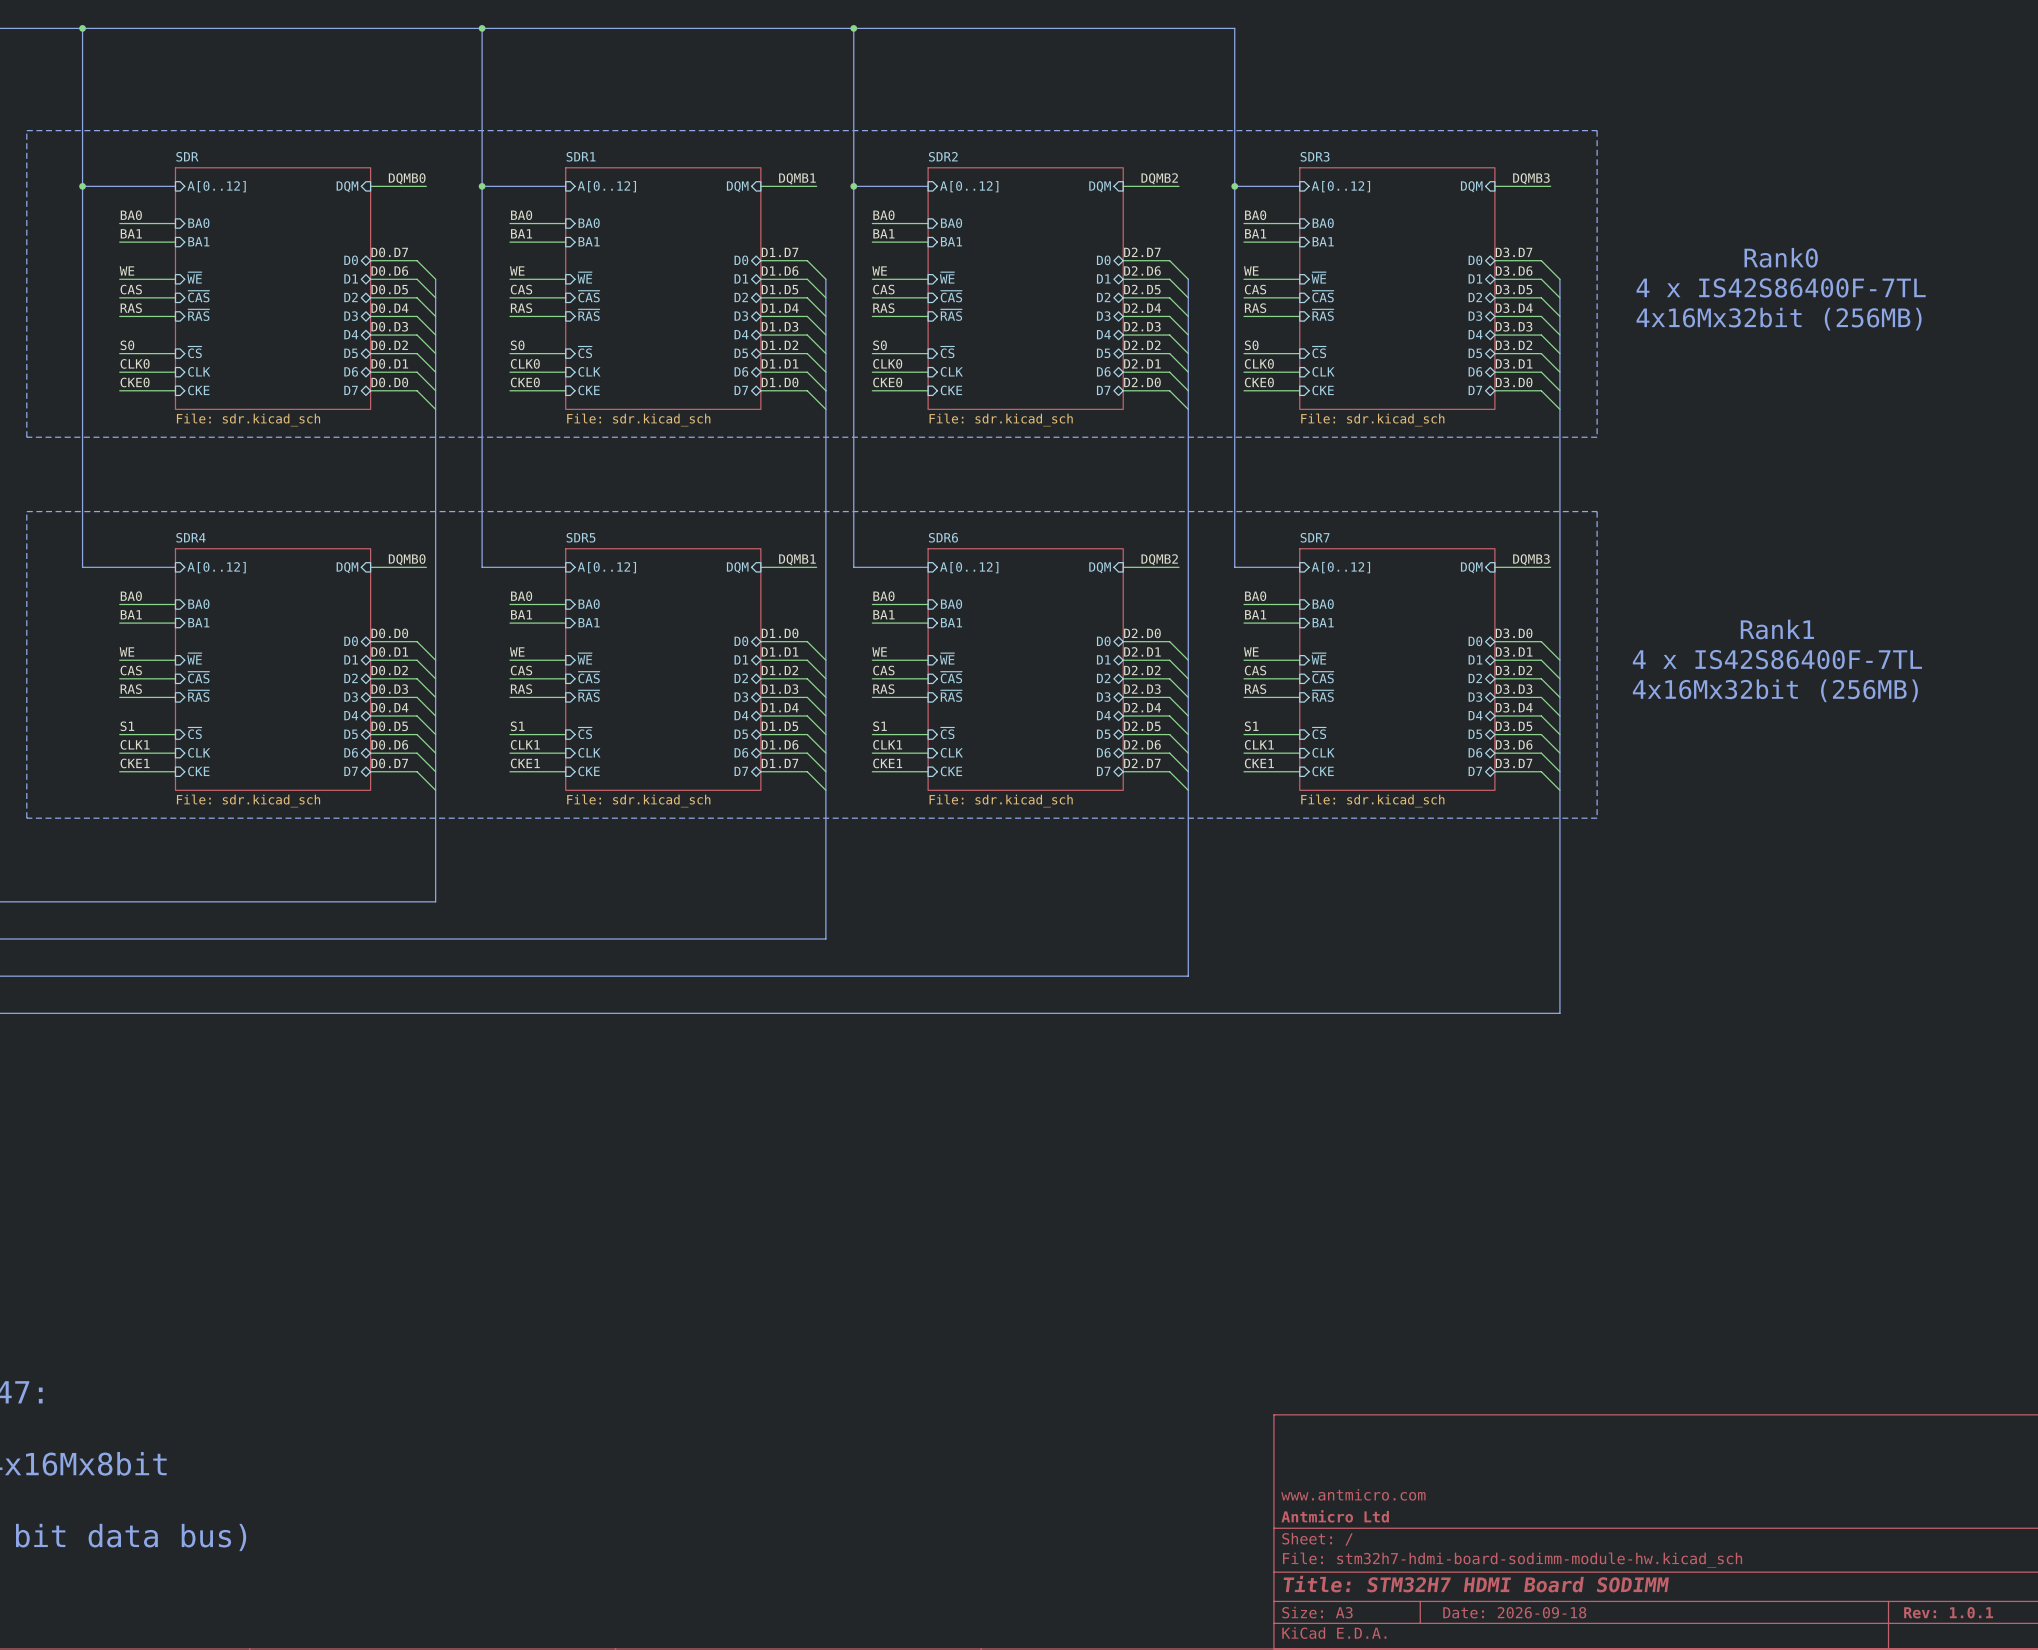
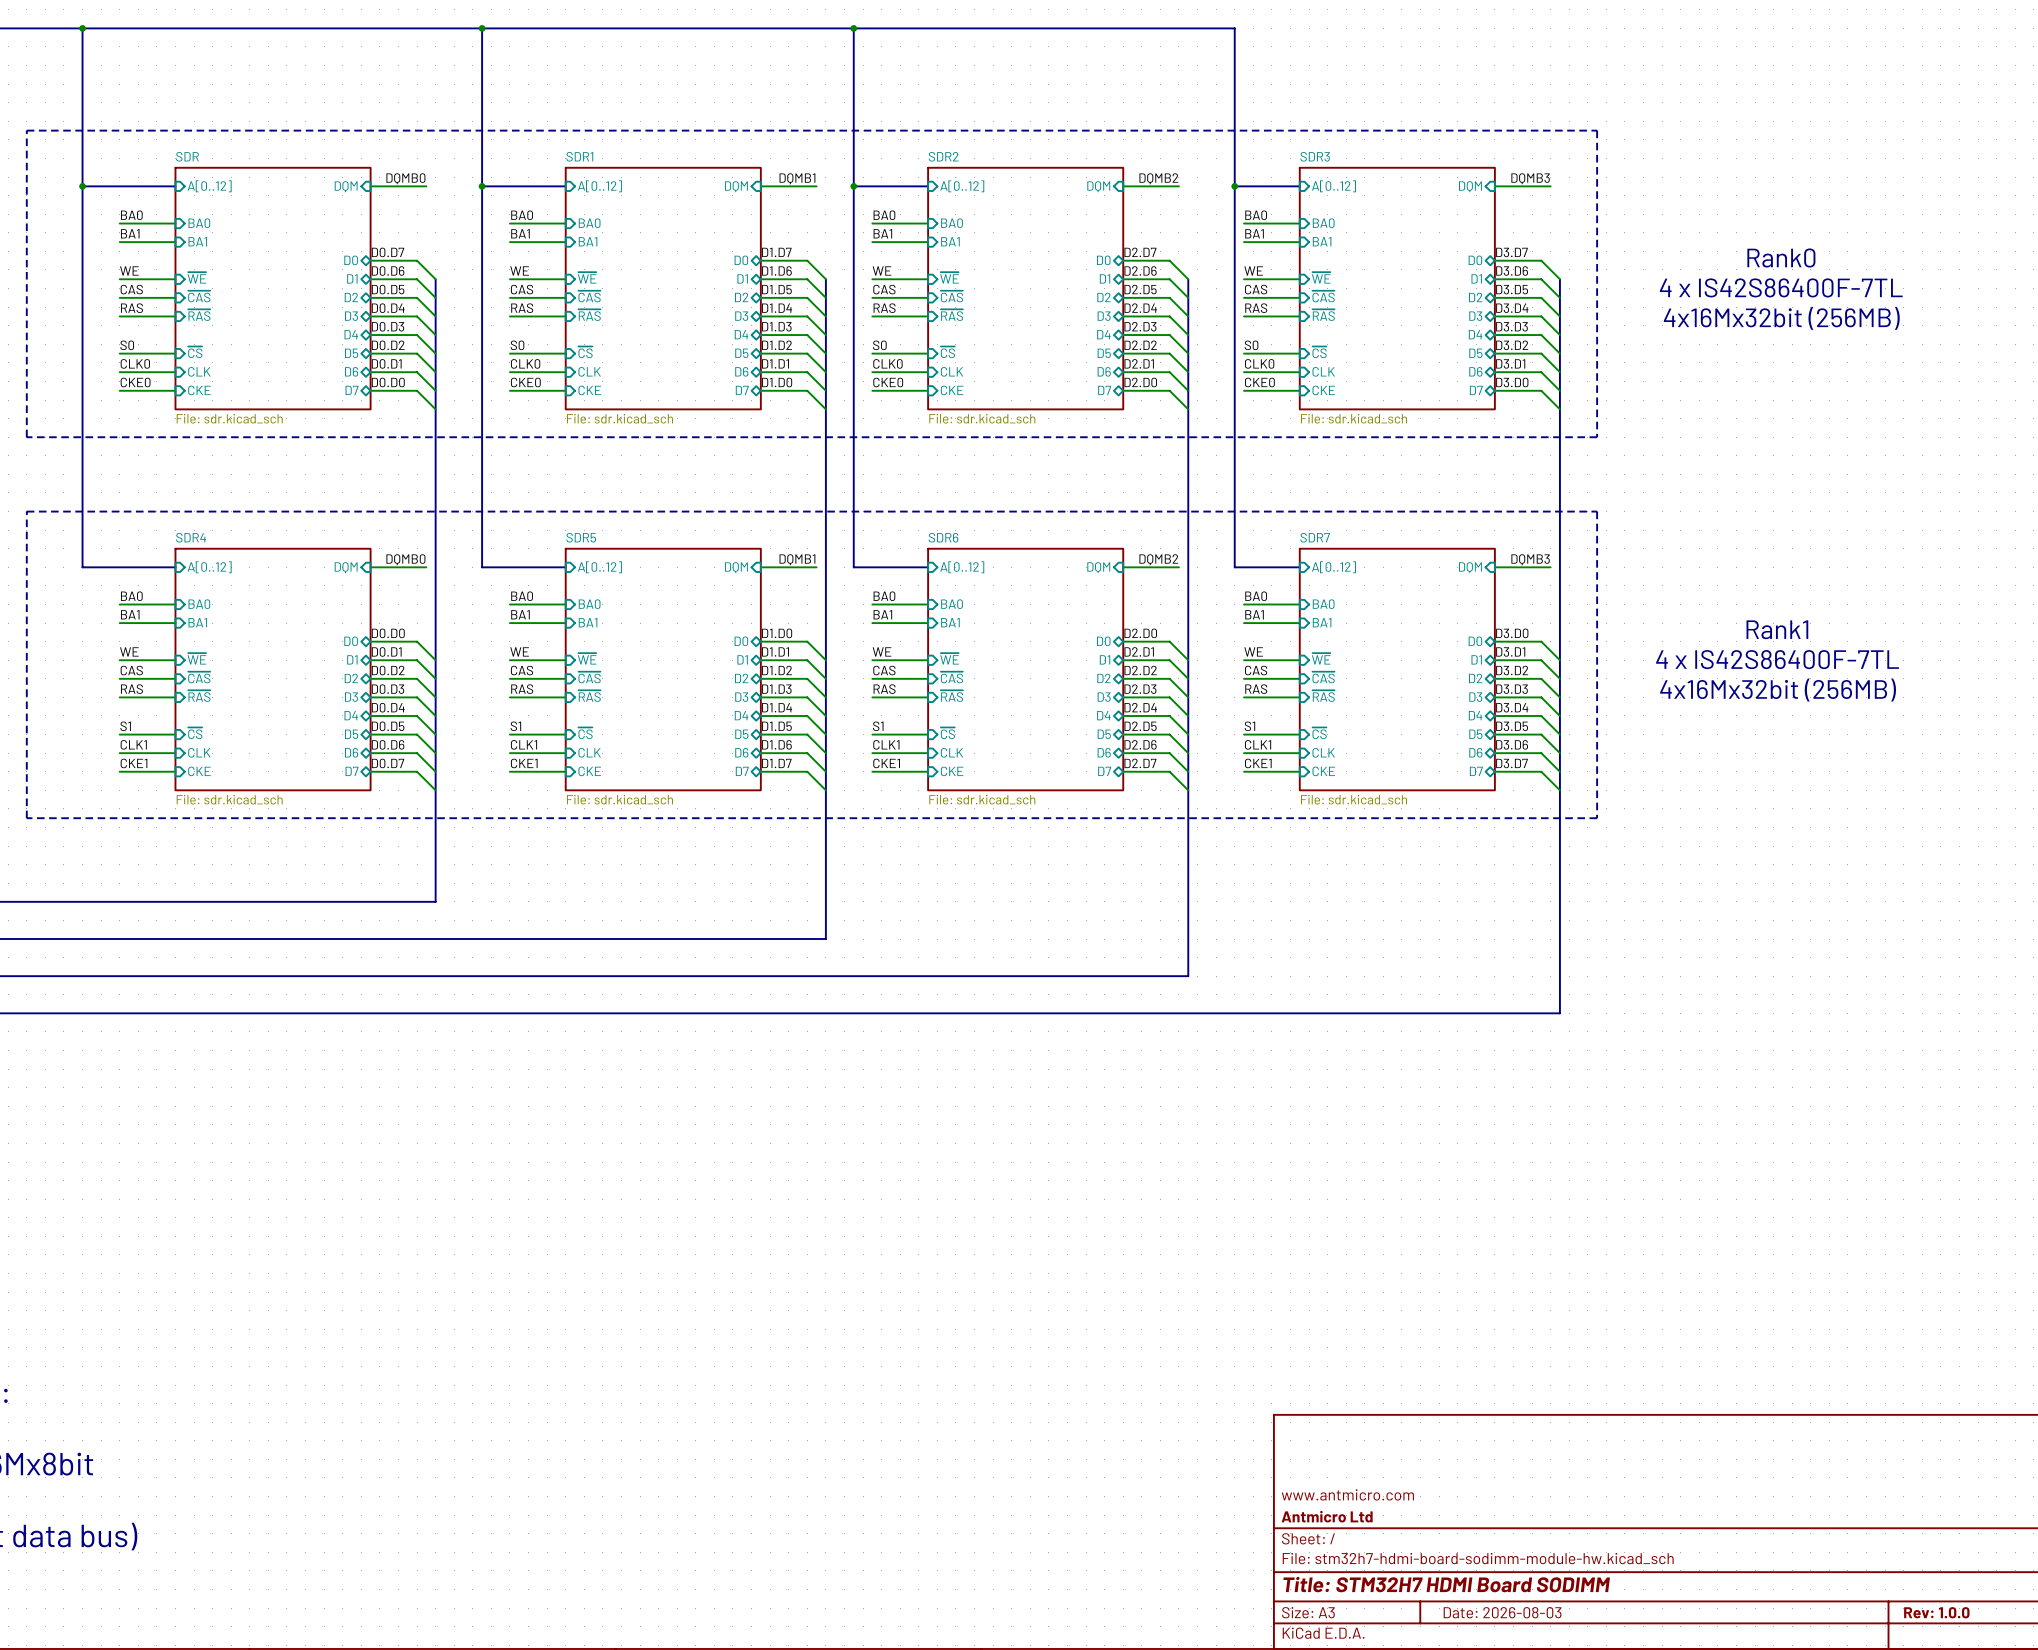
title block: Date: 2026-09-18 (1514, 1612) -> Date: 2026-08-03 (1502, 1612)
title block: Rev: 1.0.1 (1948, 1612) -> Rev: 1.0.0 (1936, 1612)

